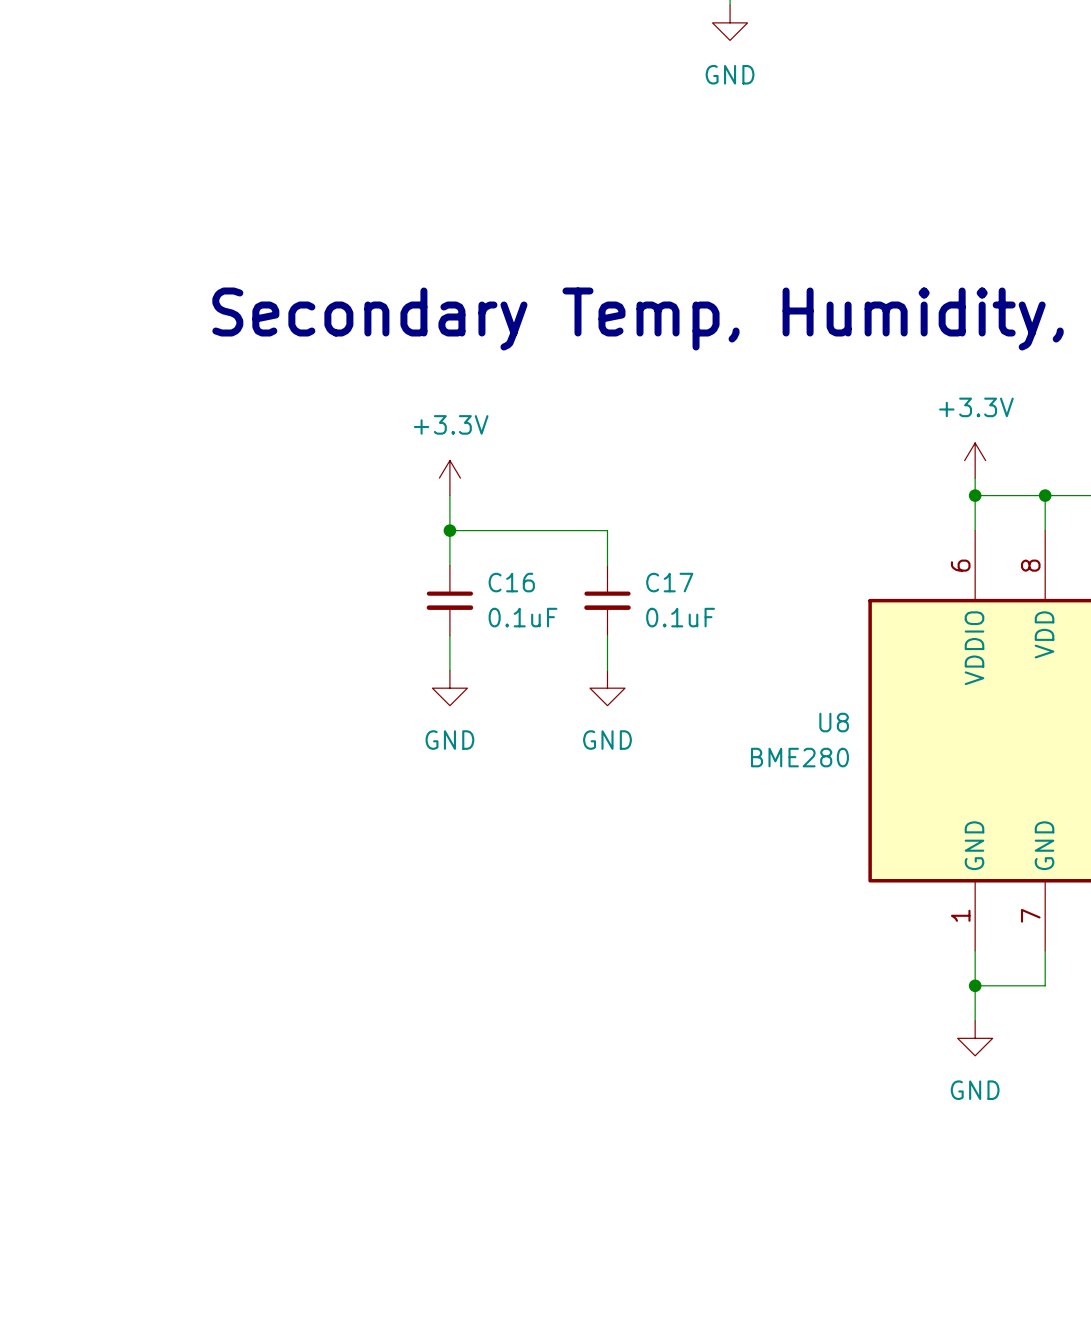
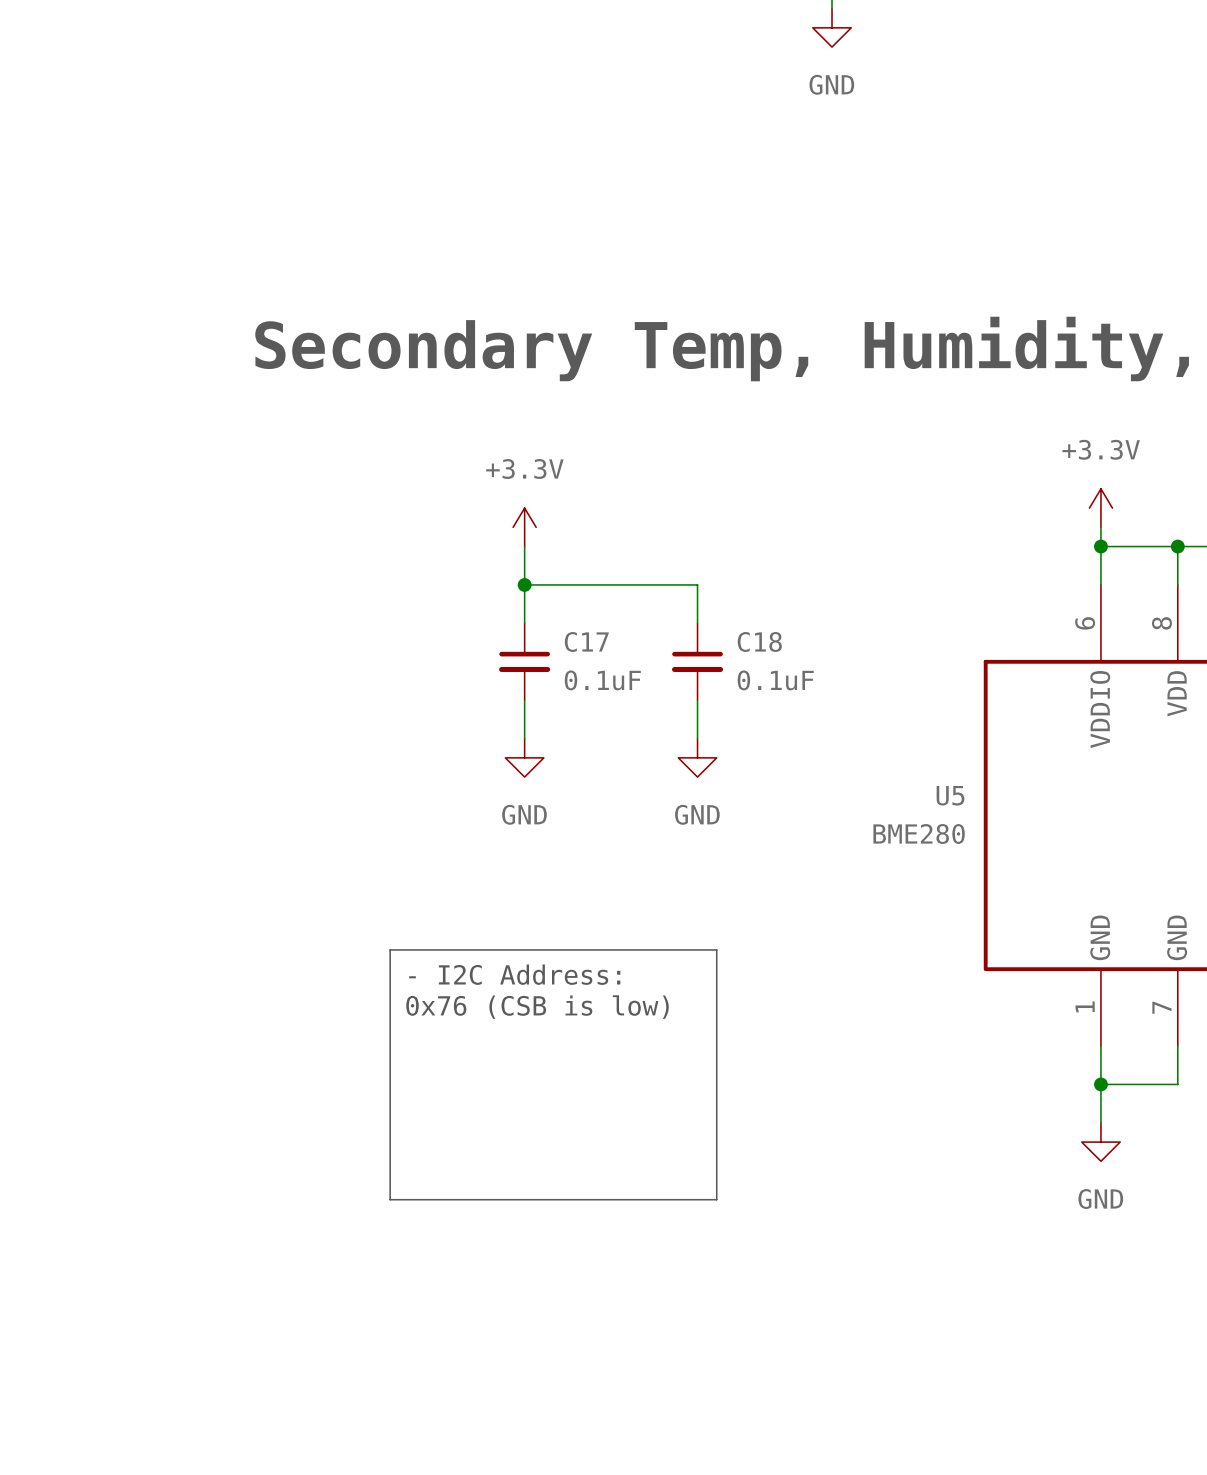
C16 name: C16 (511, 582) -> C17 (586, 641)
C17 name: C17 (669, 582) -> C18 (759, 641)
U8 name: U8 (834, 722) -> U5 (950, 795)
line: none -> (390, 949) (716, 949) (716, 1199) (390, 1199) (390, 949)
text: none -> - I2C Address: (514, 974)
text: none -> 0x76 (CSB is low) (537, 1007)

